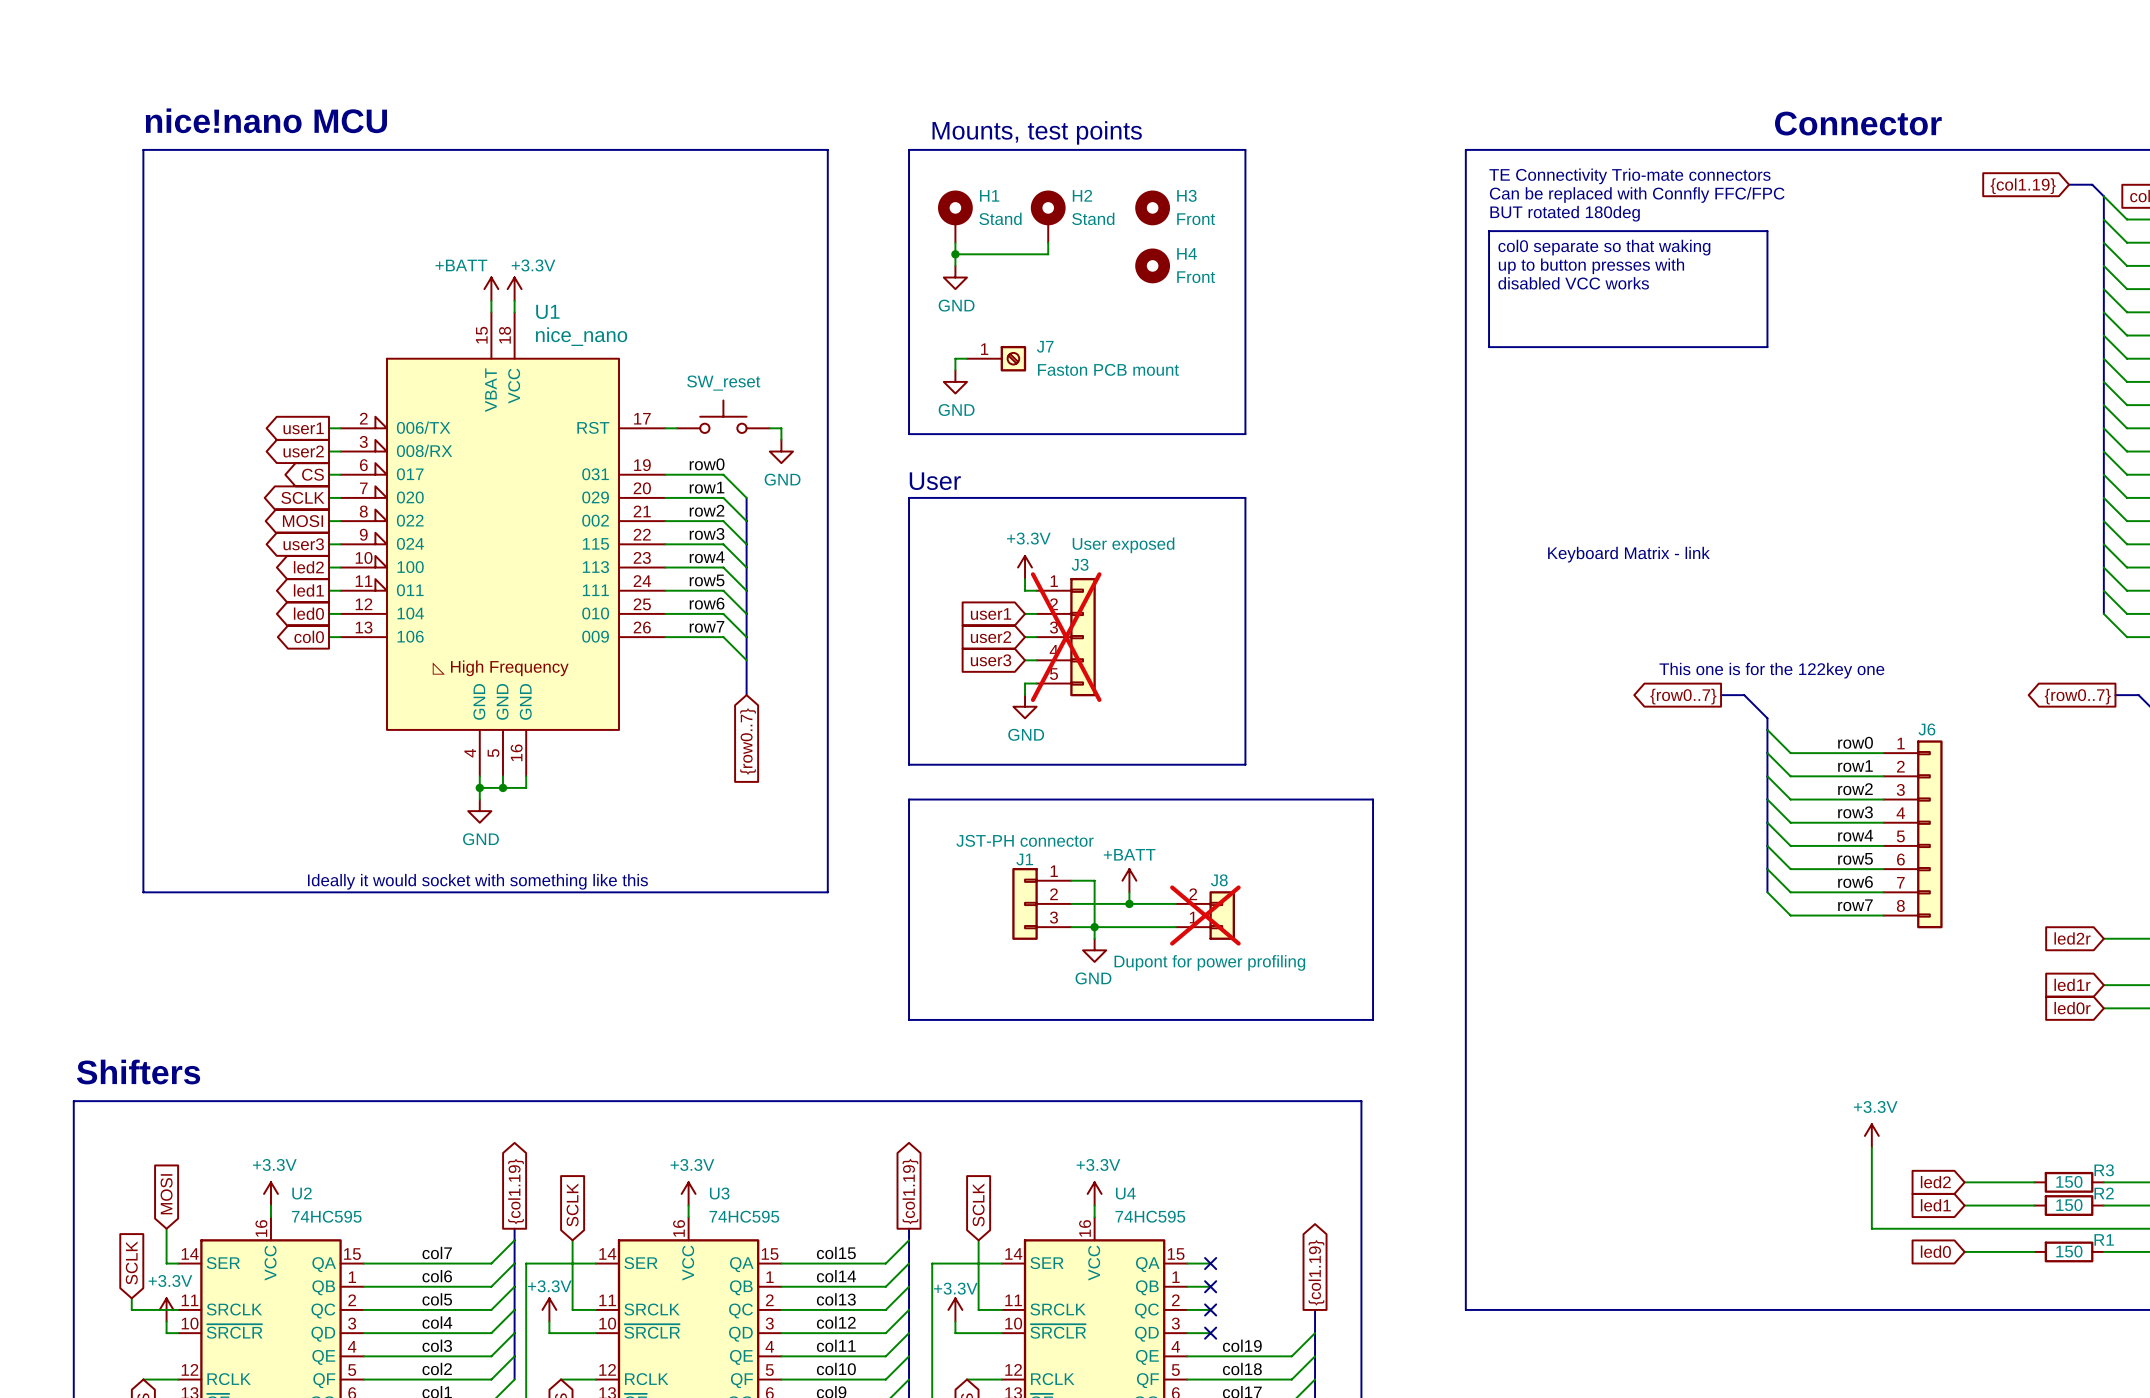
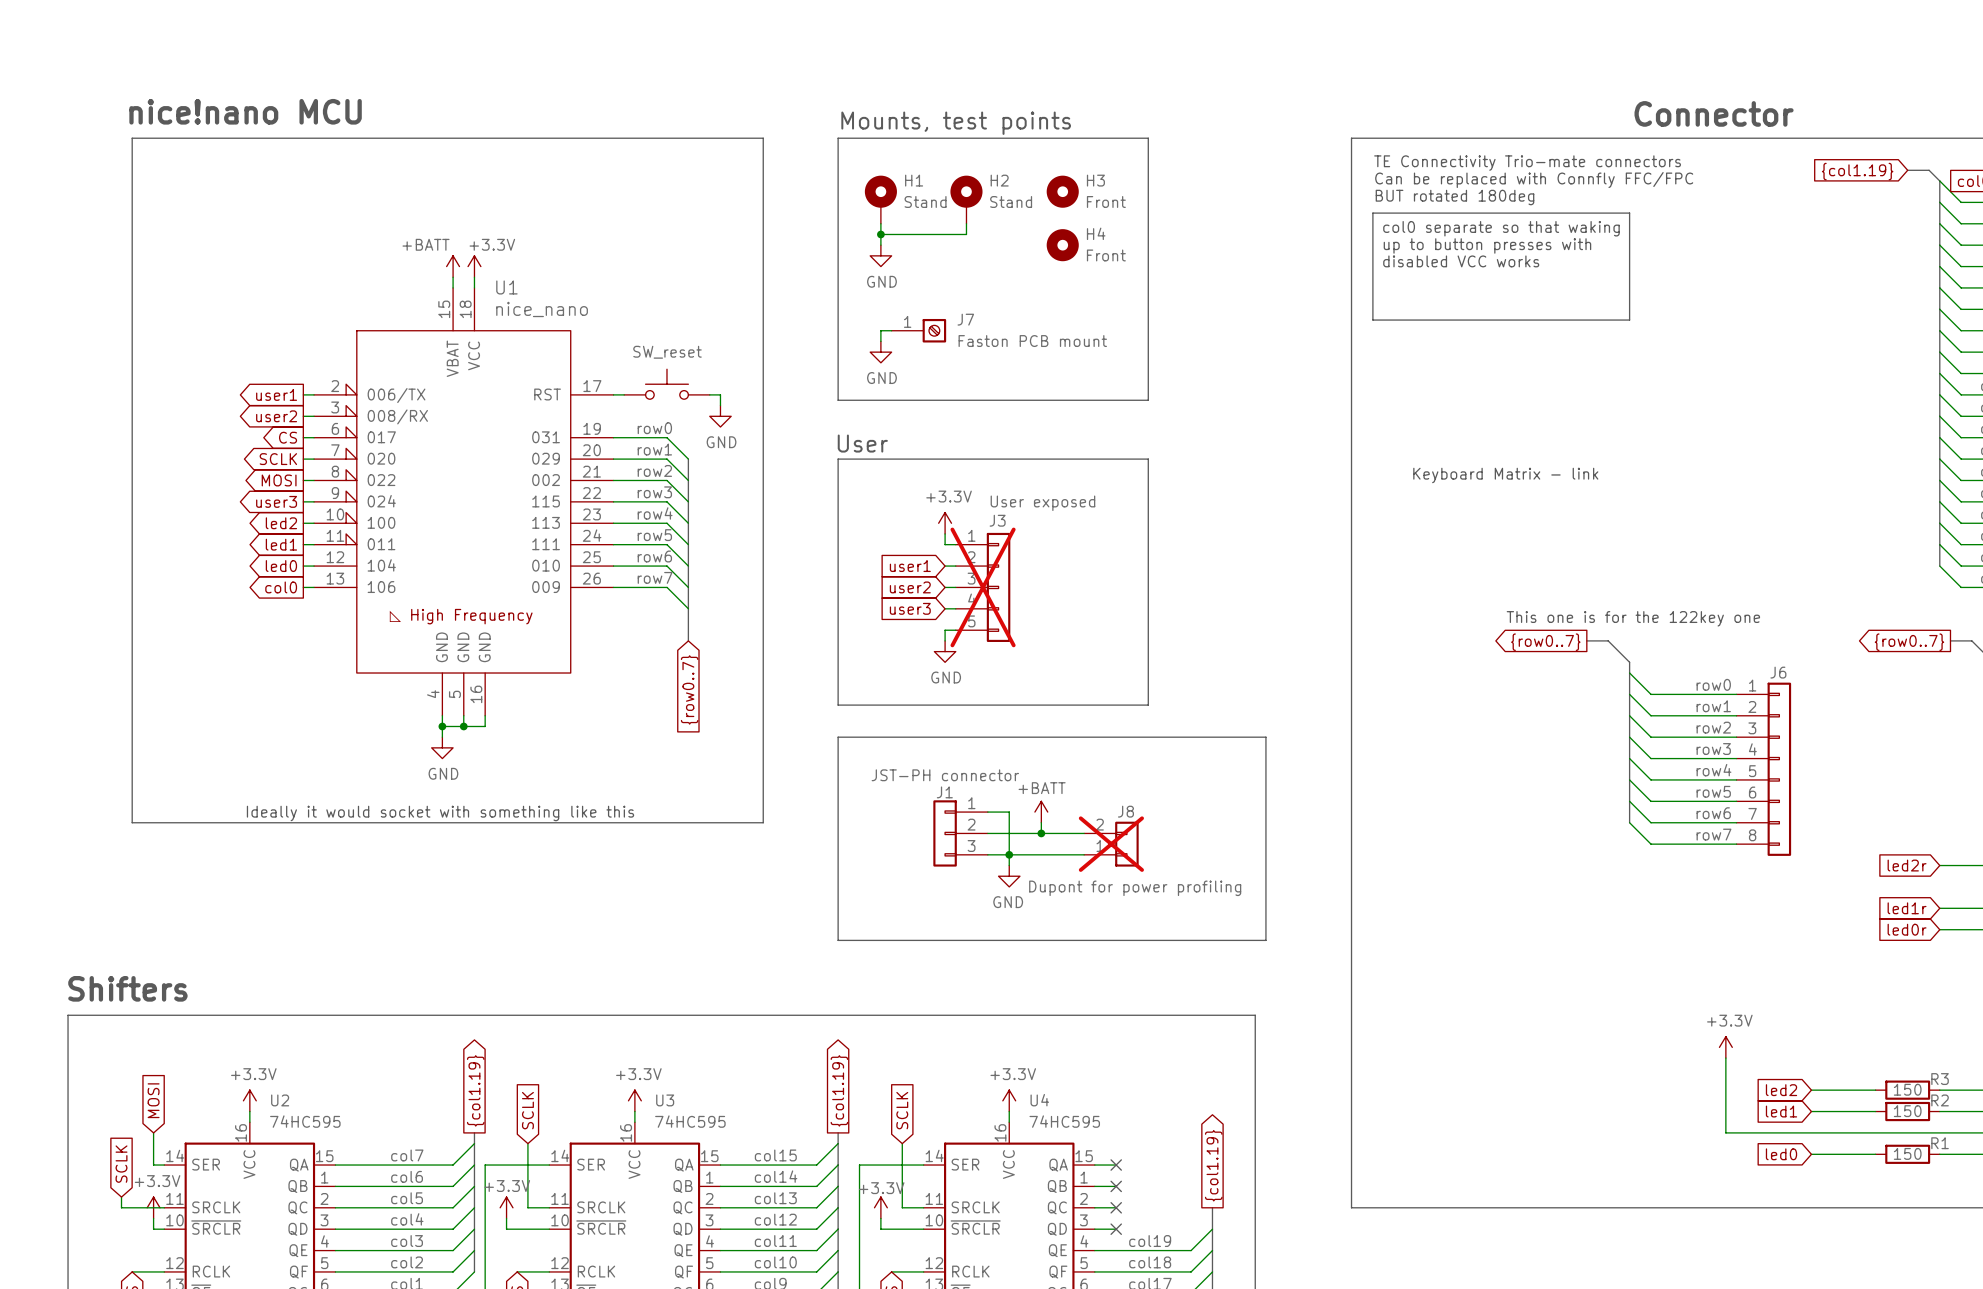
text position: Keyboard Matrix - link (1628, 554) -> Keyboard Matrix - link (1505, 475)

